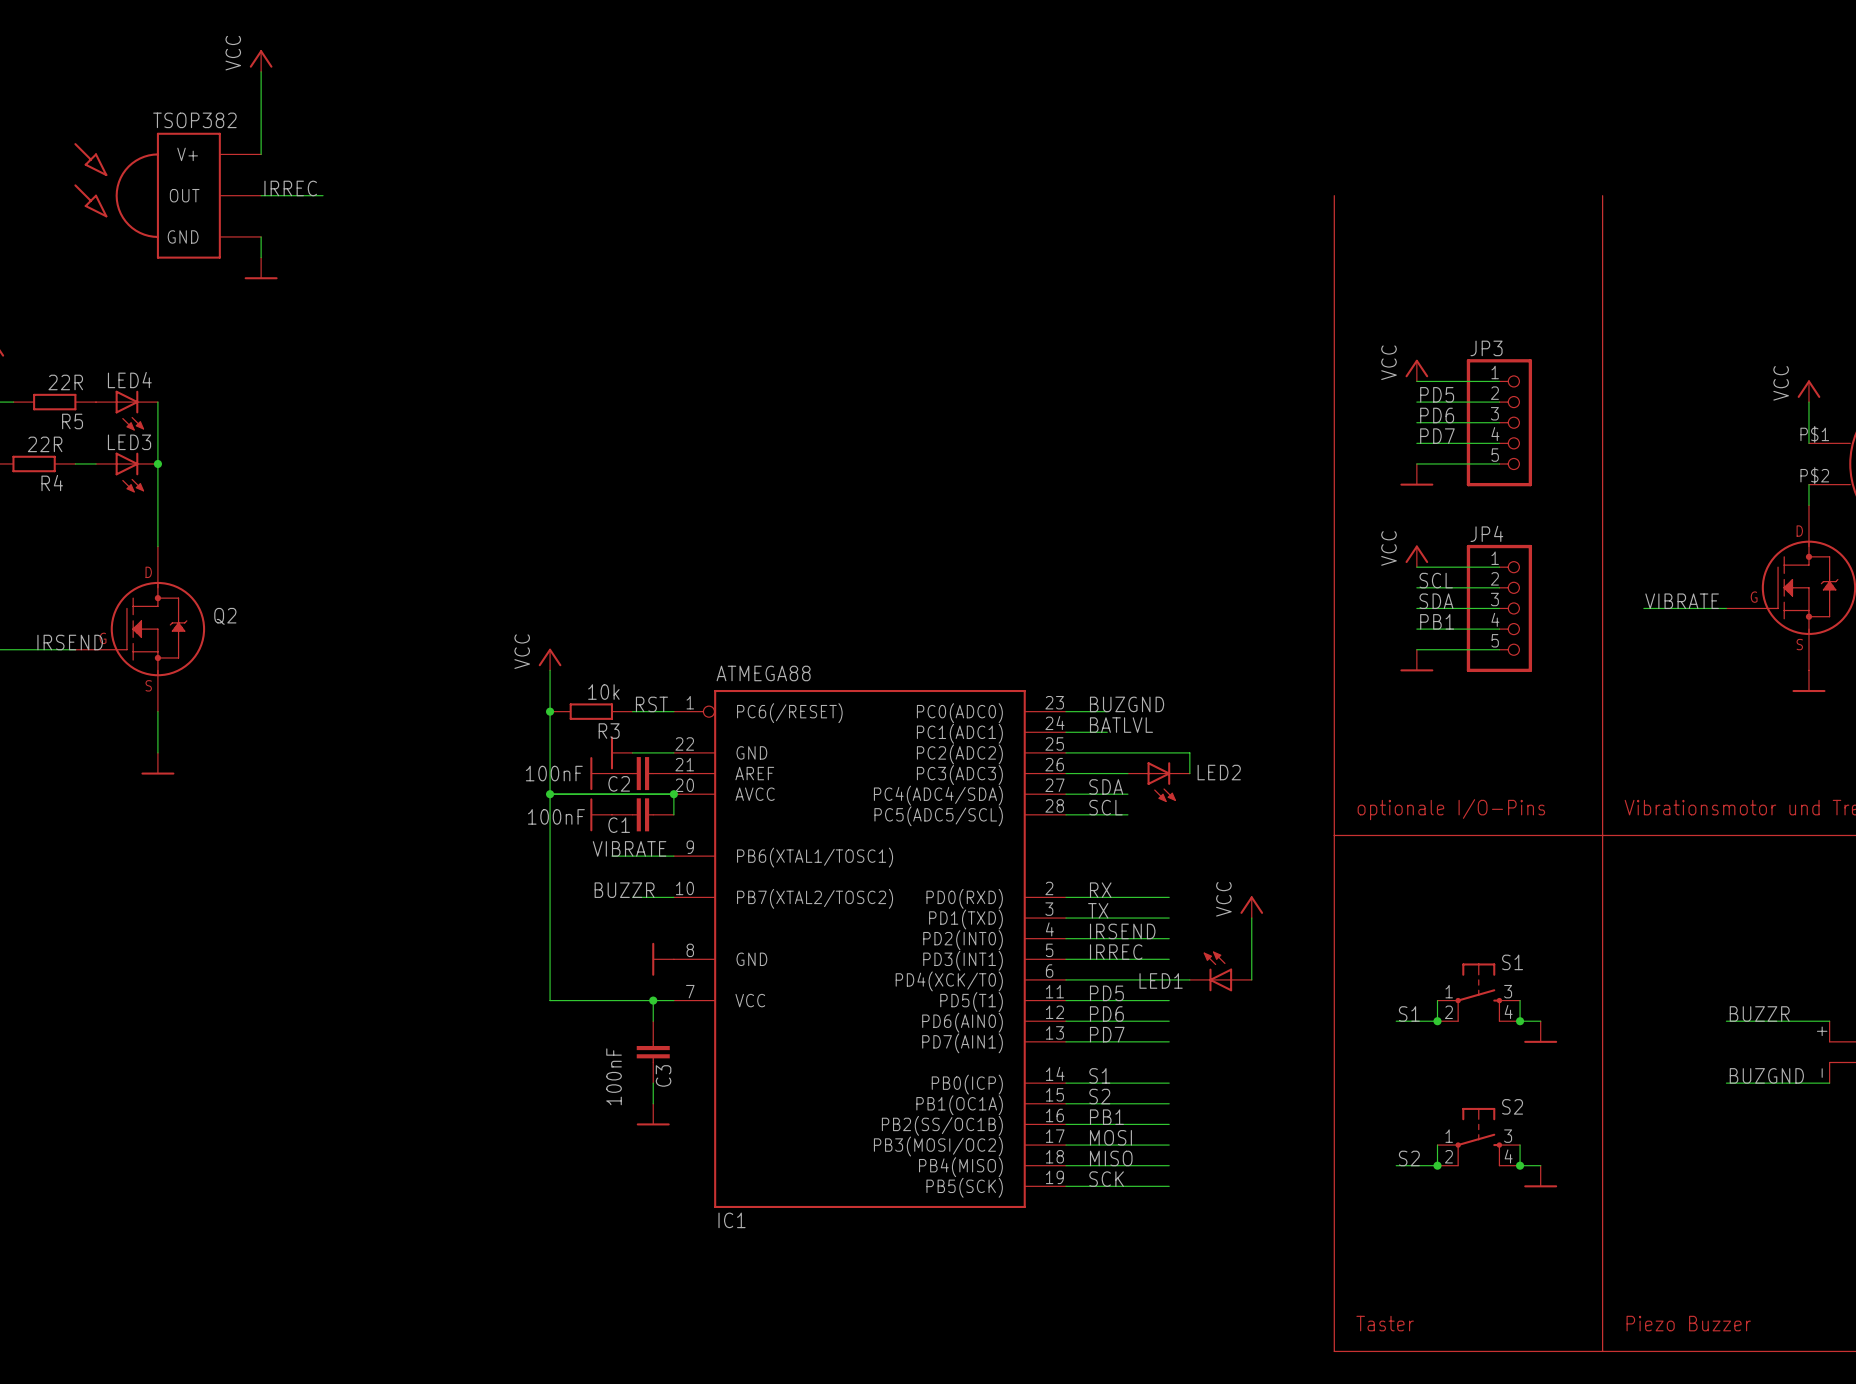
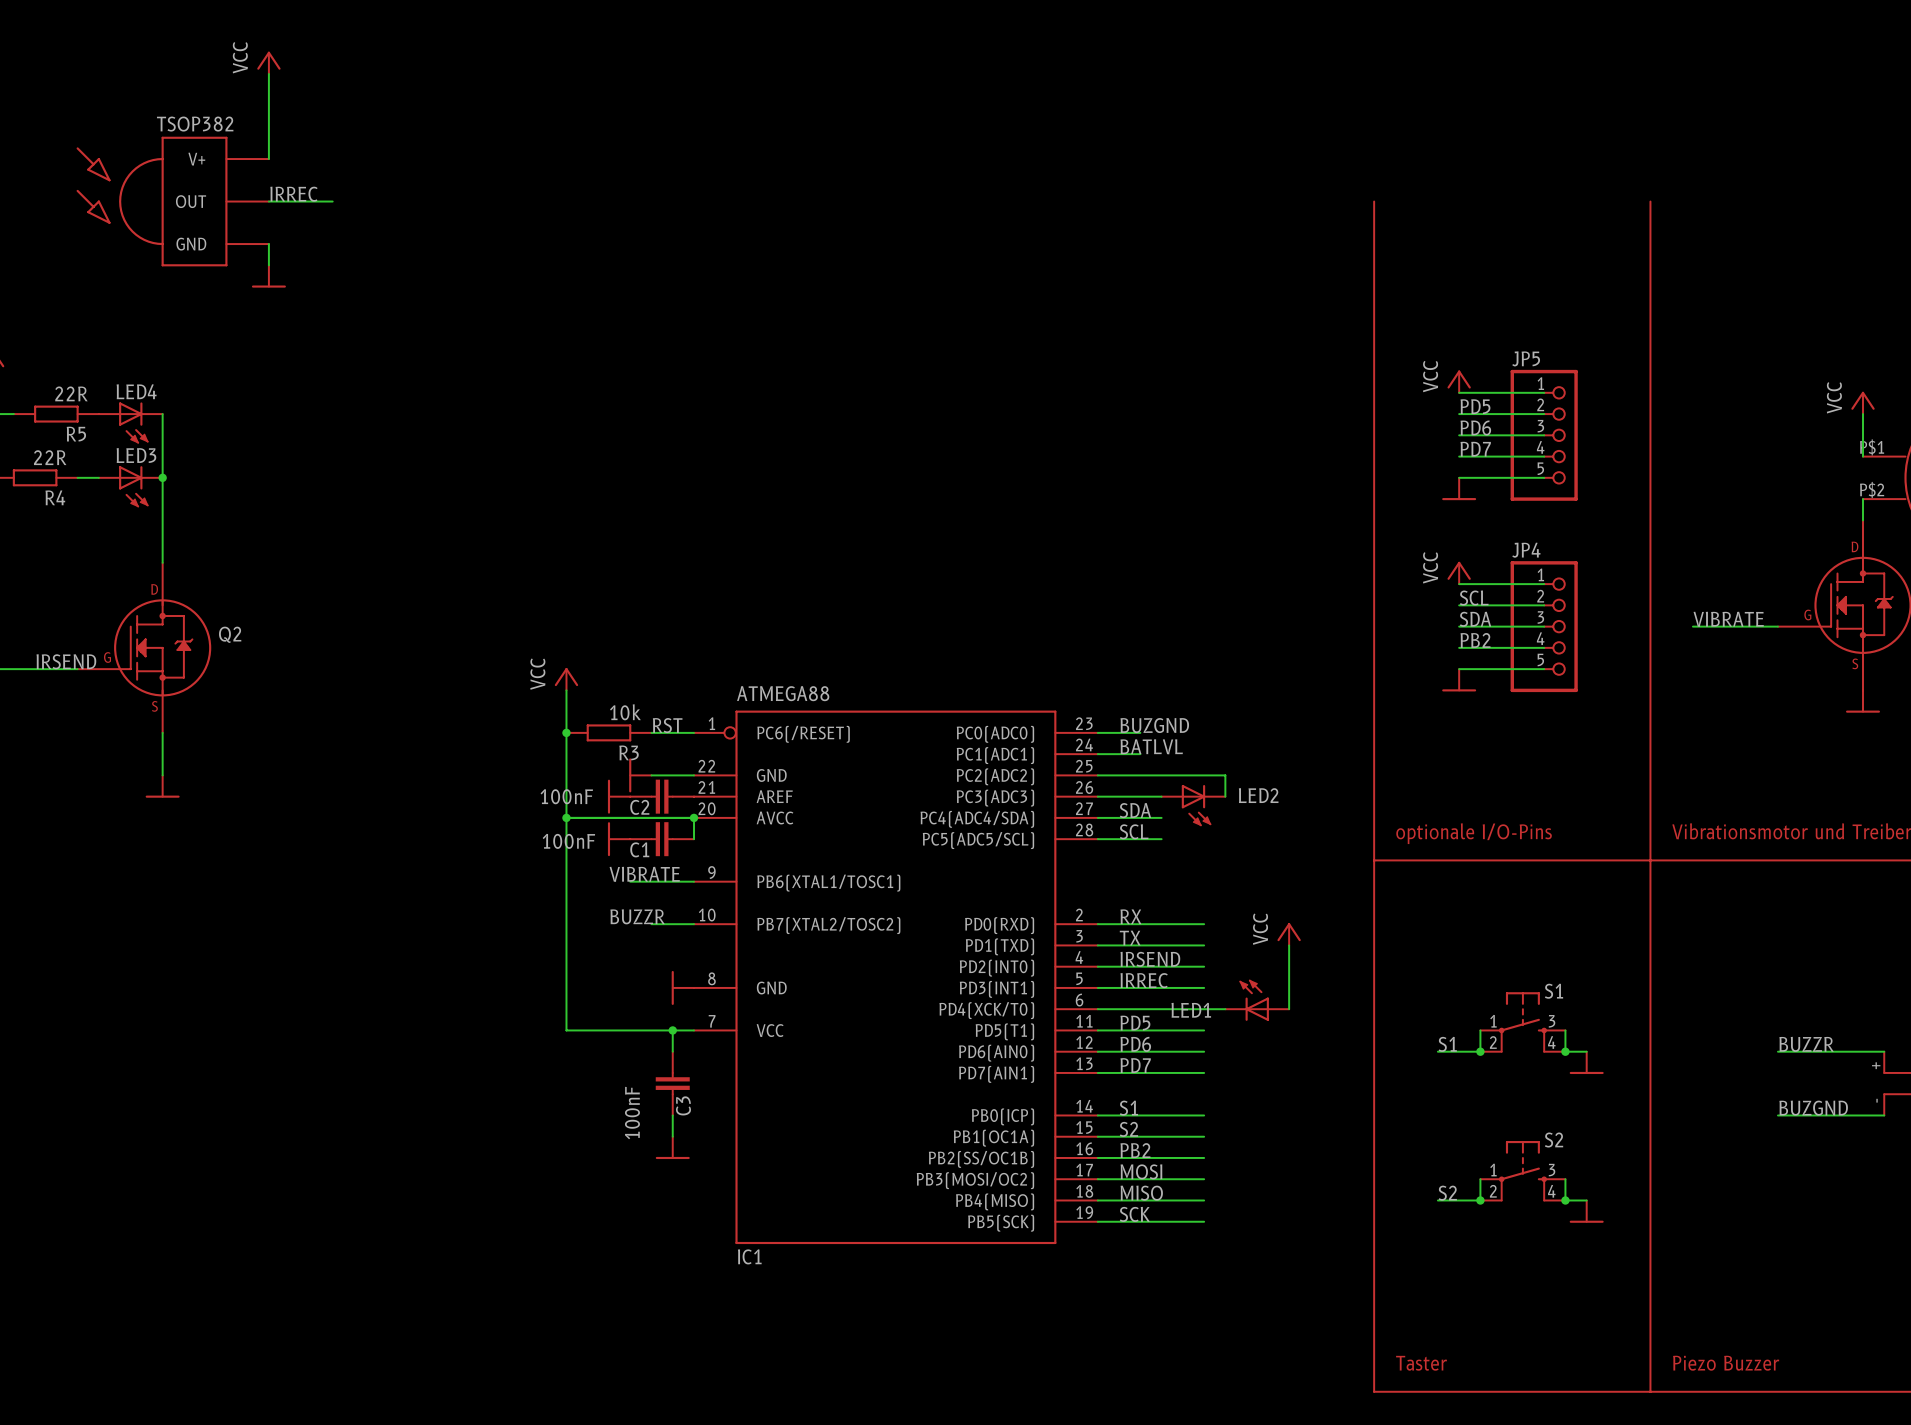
JP3 name: JP3 (1486, 348) -> JP5 (1526, 358)
label: PB1 (1437, 621) -> PB2 (1475, 640)
label: PB1 (1106, 1117) -> PB2 (1135, 1150)

